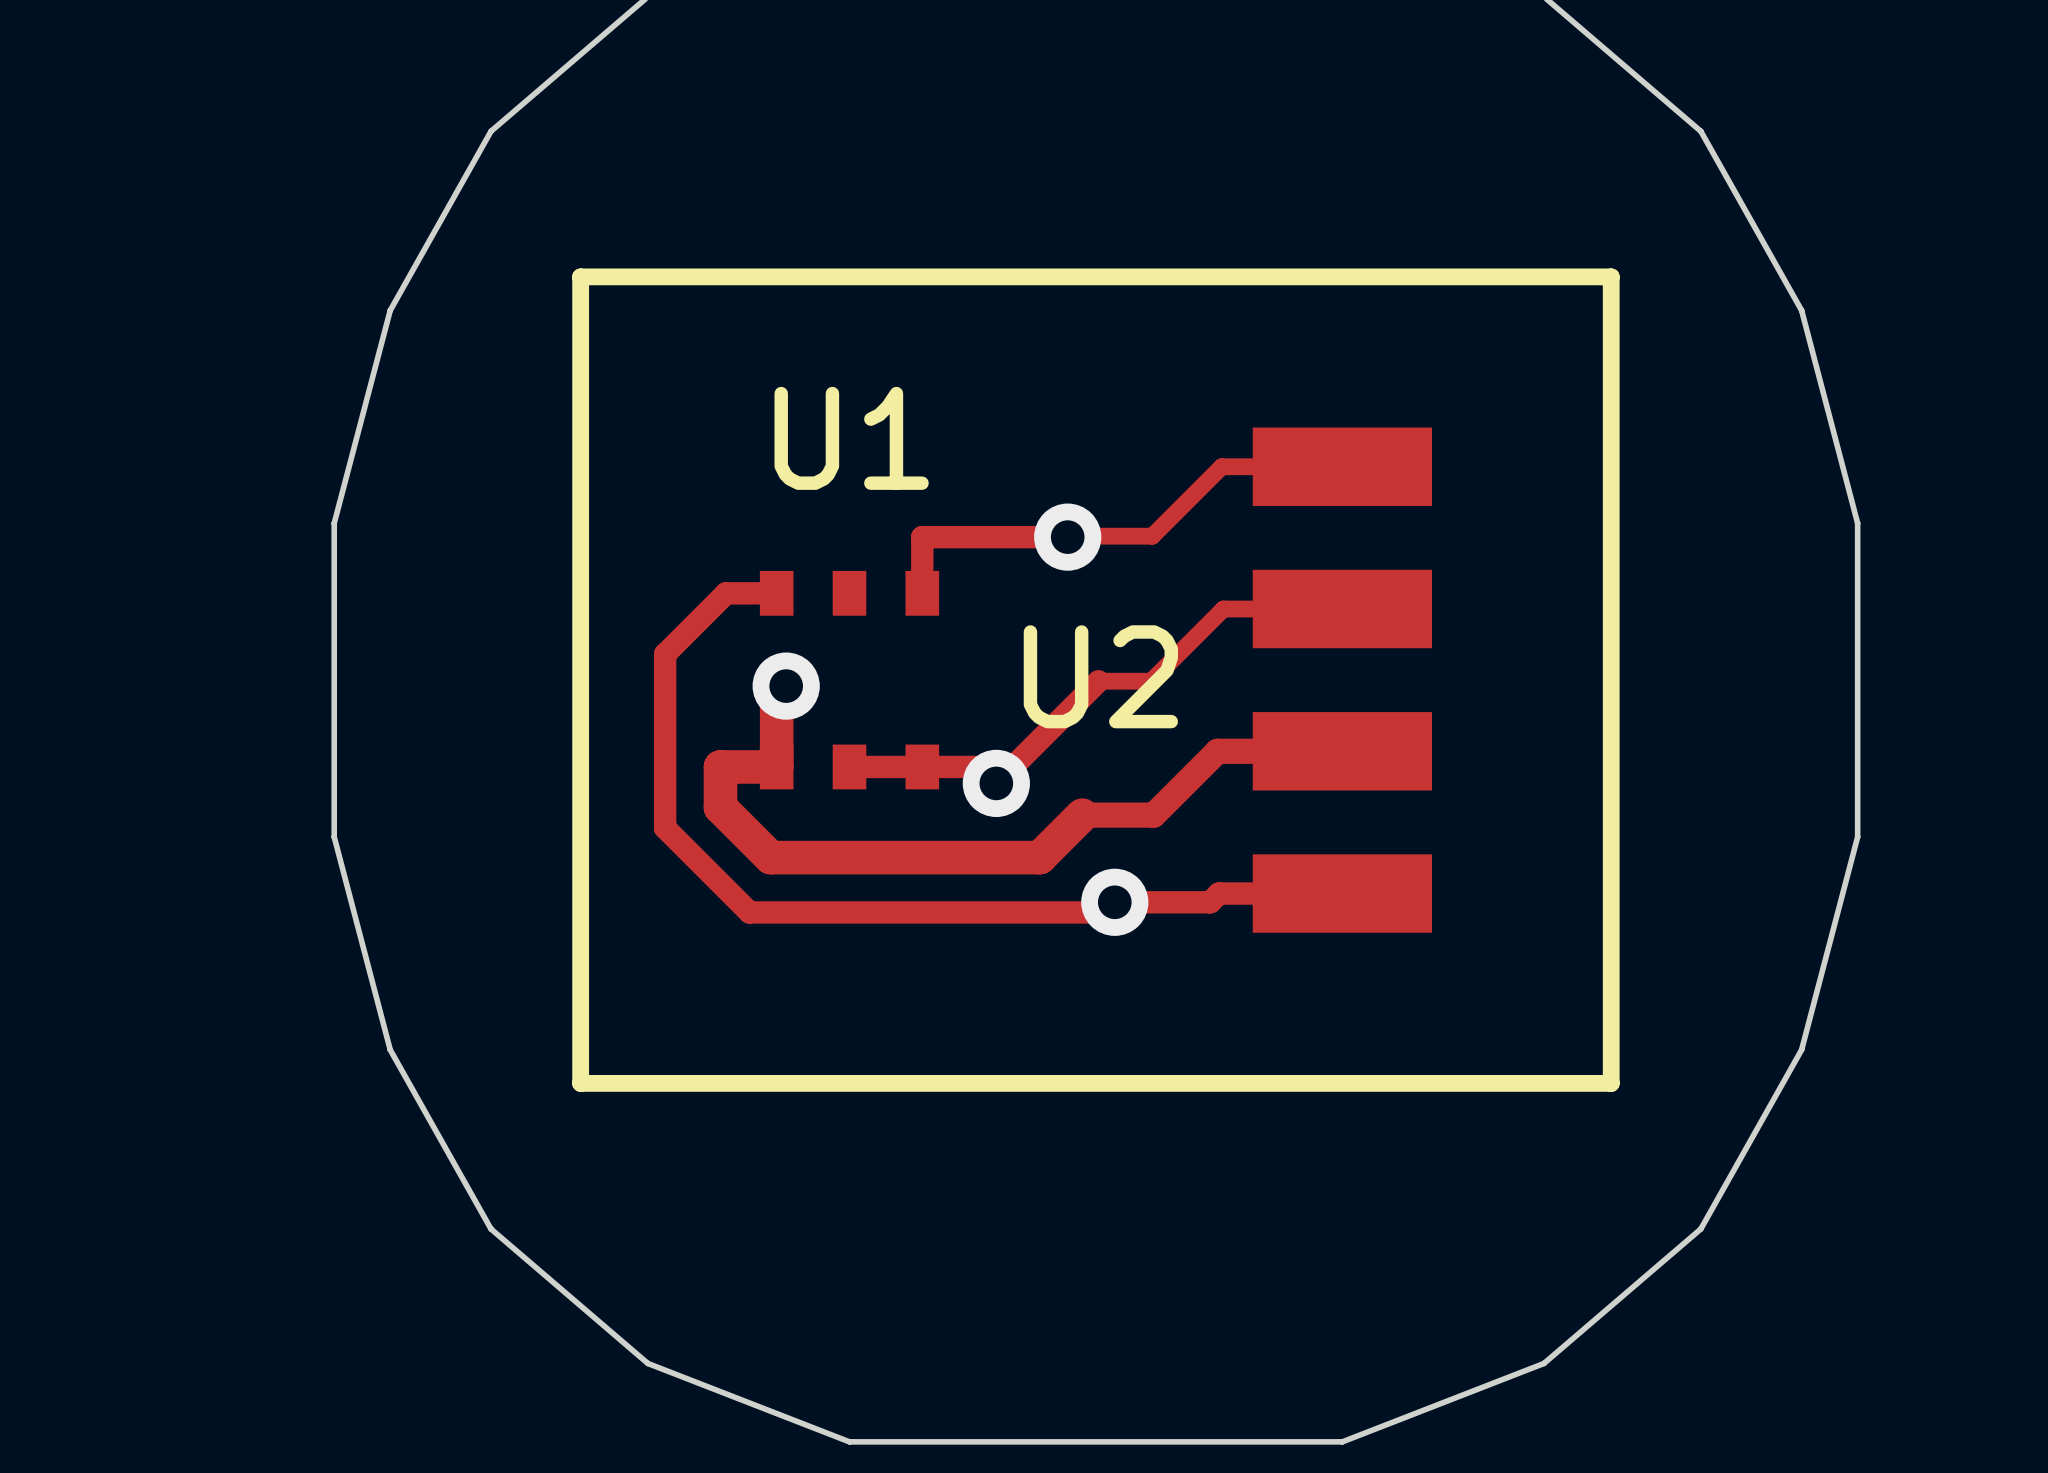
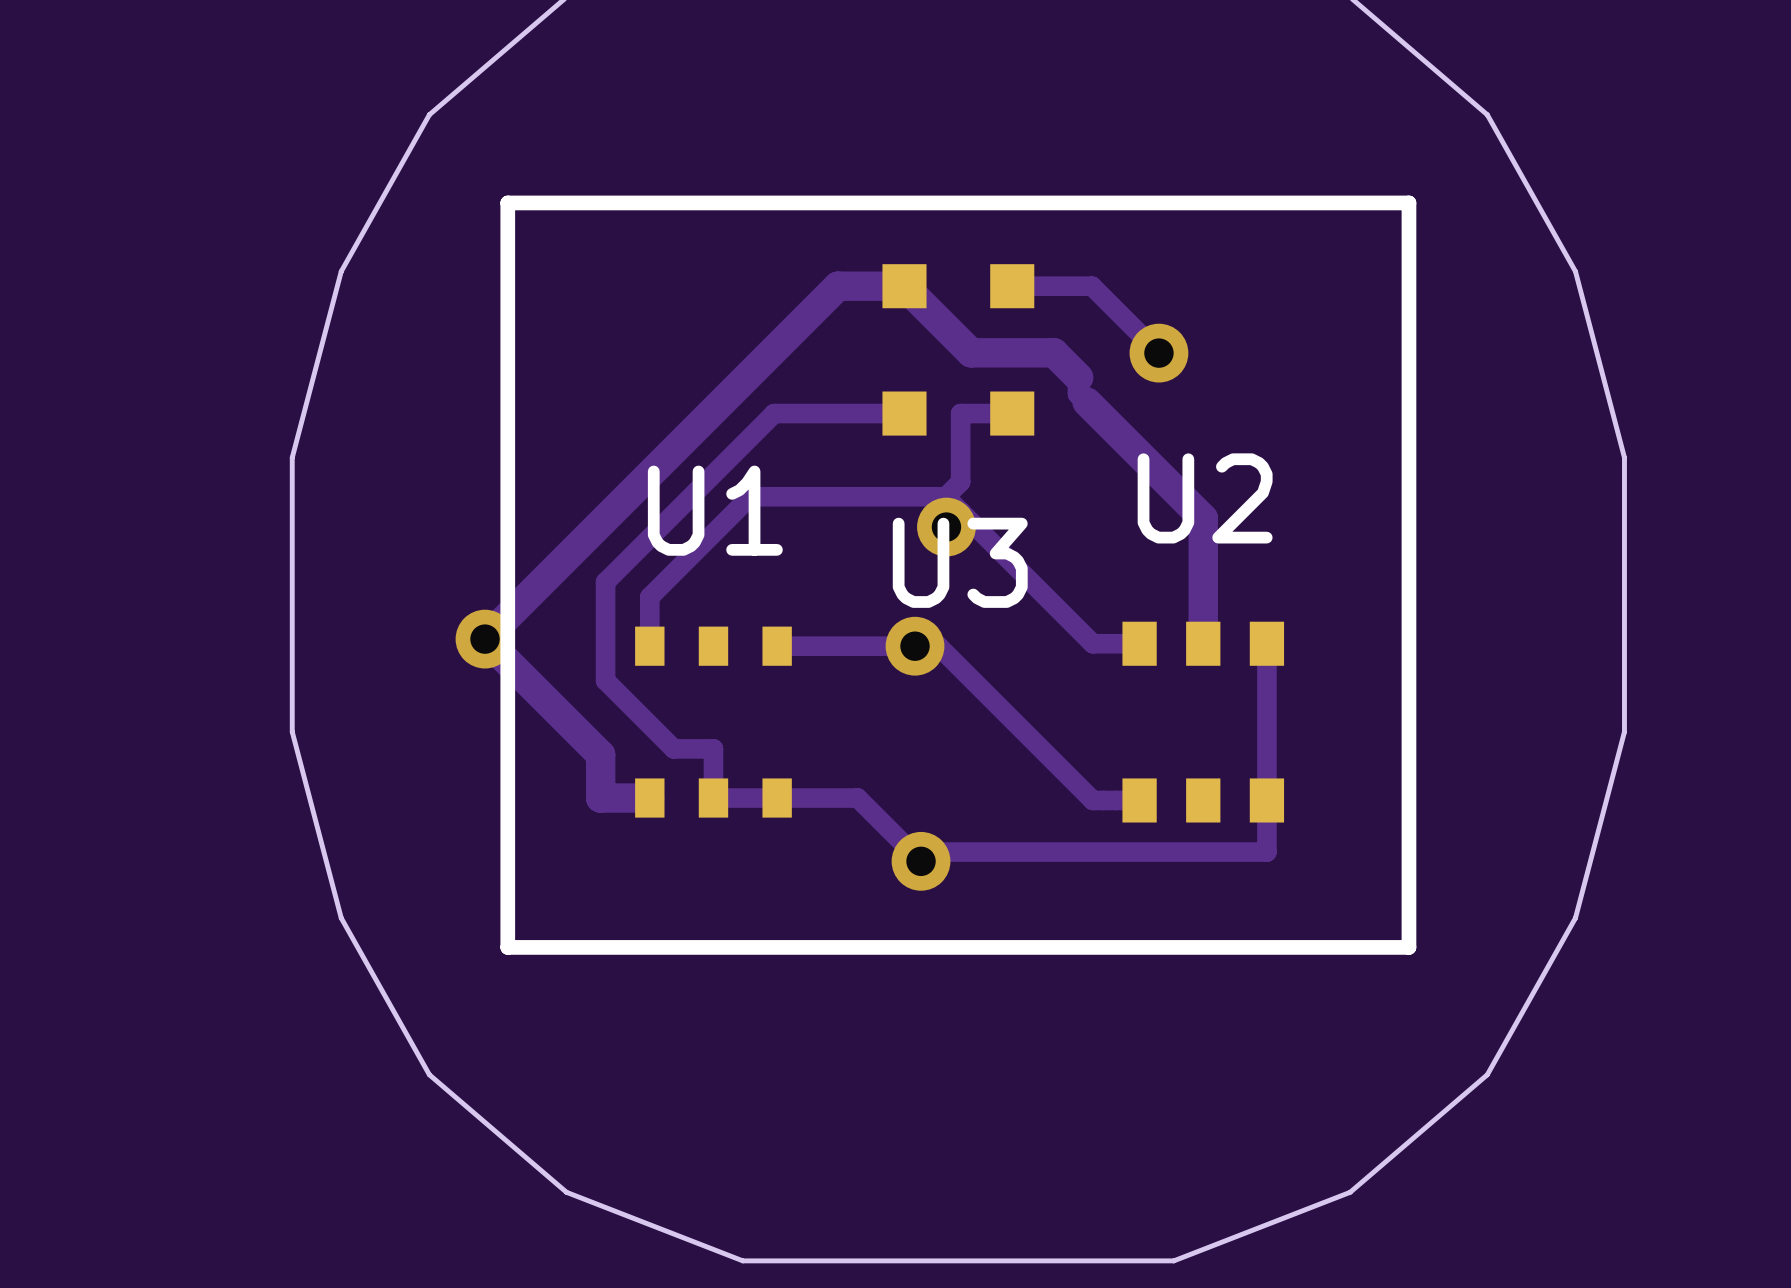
line: (580, 276) (1611, 276) -> (507, 242) (507, 202) (1408, 202) (1408, 242)
track: none -> (1012, 286) (1092, 286) (1158, 353)
U3: none -> (958, 349)
via: none -> (1158, 353)
U2 footprint: [1252, 427, 1432, 933] -> [1122, 621, 1285, 823]
track: (1342, 466) (1221, 466) (1152, 536) (1067, 536) -> none
track: none -> (904, 413) (774, 413) (605, 582) (605, 680) (673, 748) (713, 748) (713, 798) (857, 798) (921, 861)
track: none -> (1012, 413) (960, 413) (960, 482) (945, 496)
track: (1067, 537) (922, 537) (922, 593) -> none
via position: (1067, 537) -> (946, 527)
track: none -> (945, 496) (1092, 643) (1139, 643)
track: none -> (945, 496) (750, 496) (649, 597) (649, 646)
track: (776, 593) (726, 593) (665, 654) (665, 828) (749, 912) (1104, 912) (1114, 902) (1210, 902) (1218, 893) (1342, 893) -> none
track: (1342, 609) (1223, 609) (1151, 681) (1102, 681) -> none
U2 name position: U2 (1100, 676) -> U2 (1205, 498)
U1 position: (849, 680) -> (713, 722)
track: (1098, 681) (996, 783) -> none
track: (786, 686) (776, 695) (776, 766) (720, 766) (720, 807) (770, 857) (1039, 857) (1082, 815) (1153, 815) (1217, 751) (1342, 751) -> none
via: (786, 686) -> none
via: none -> (485, 639)
track: none -> (1203, 643) (1203, 518) (1078, 393) (1078, 377) (1053, 352) (971, 352) (904, 286) (837, 286) (485, 639) (600, 754) (600, 798) (649, 798)
track: none -> (1266, 643) (1266, 852) (930, 852)
track: none -> (777, 646) (938, 646) (1092, 800) (1139, 800)
track: (849, 766) (979, 766) -> none
via position: (996, 783) -> (915, 646)
via: (1114, 902) -> none
via: none -> (921, 861)

